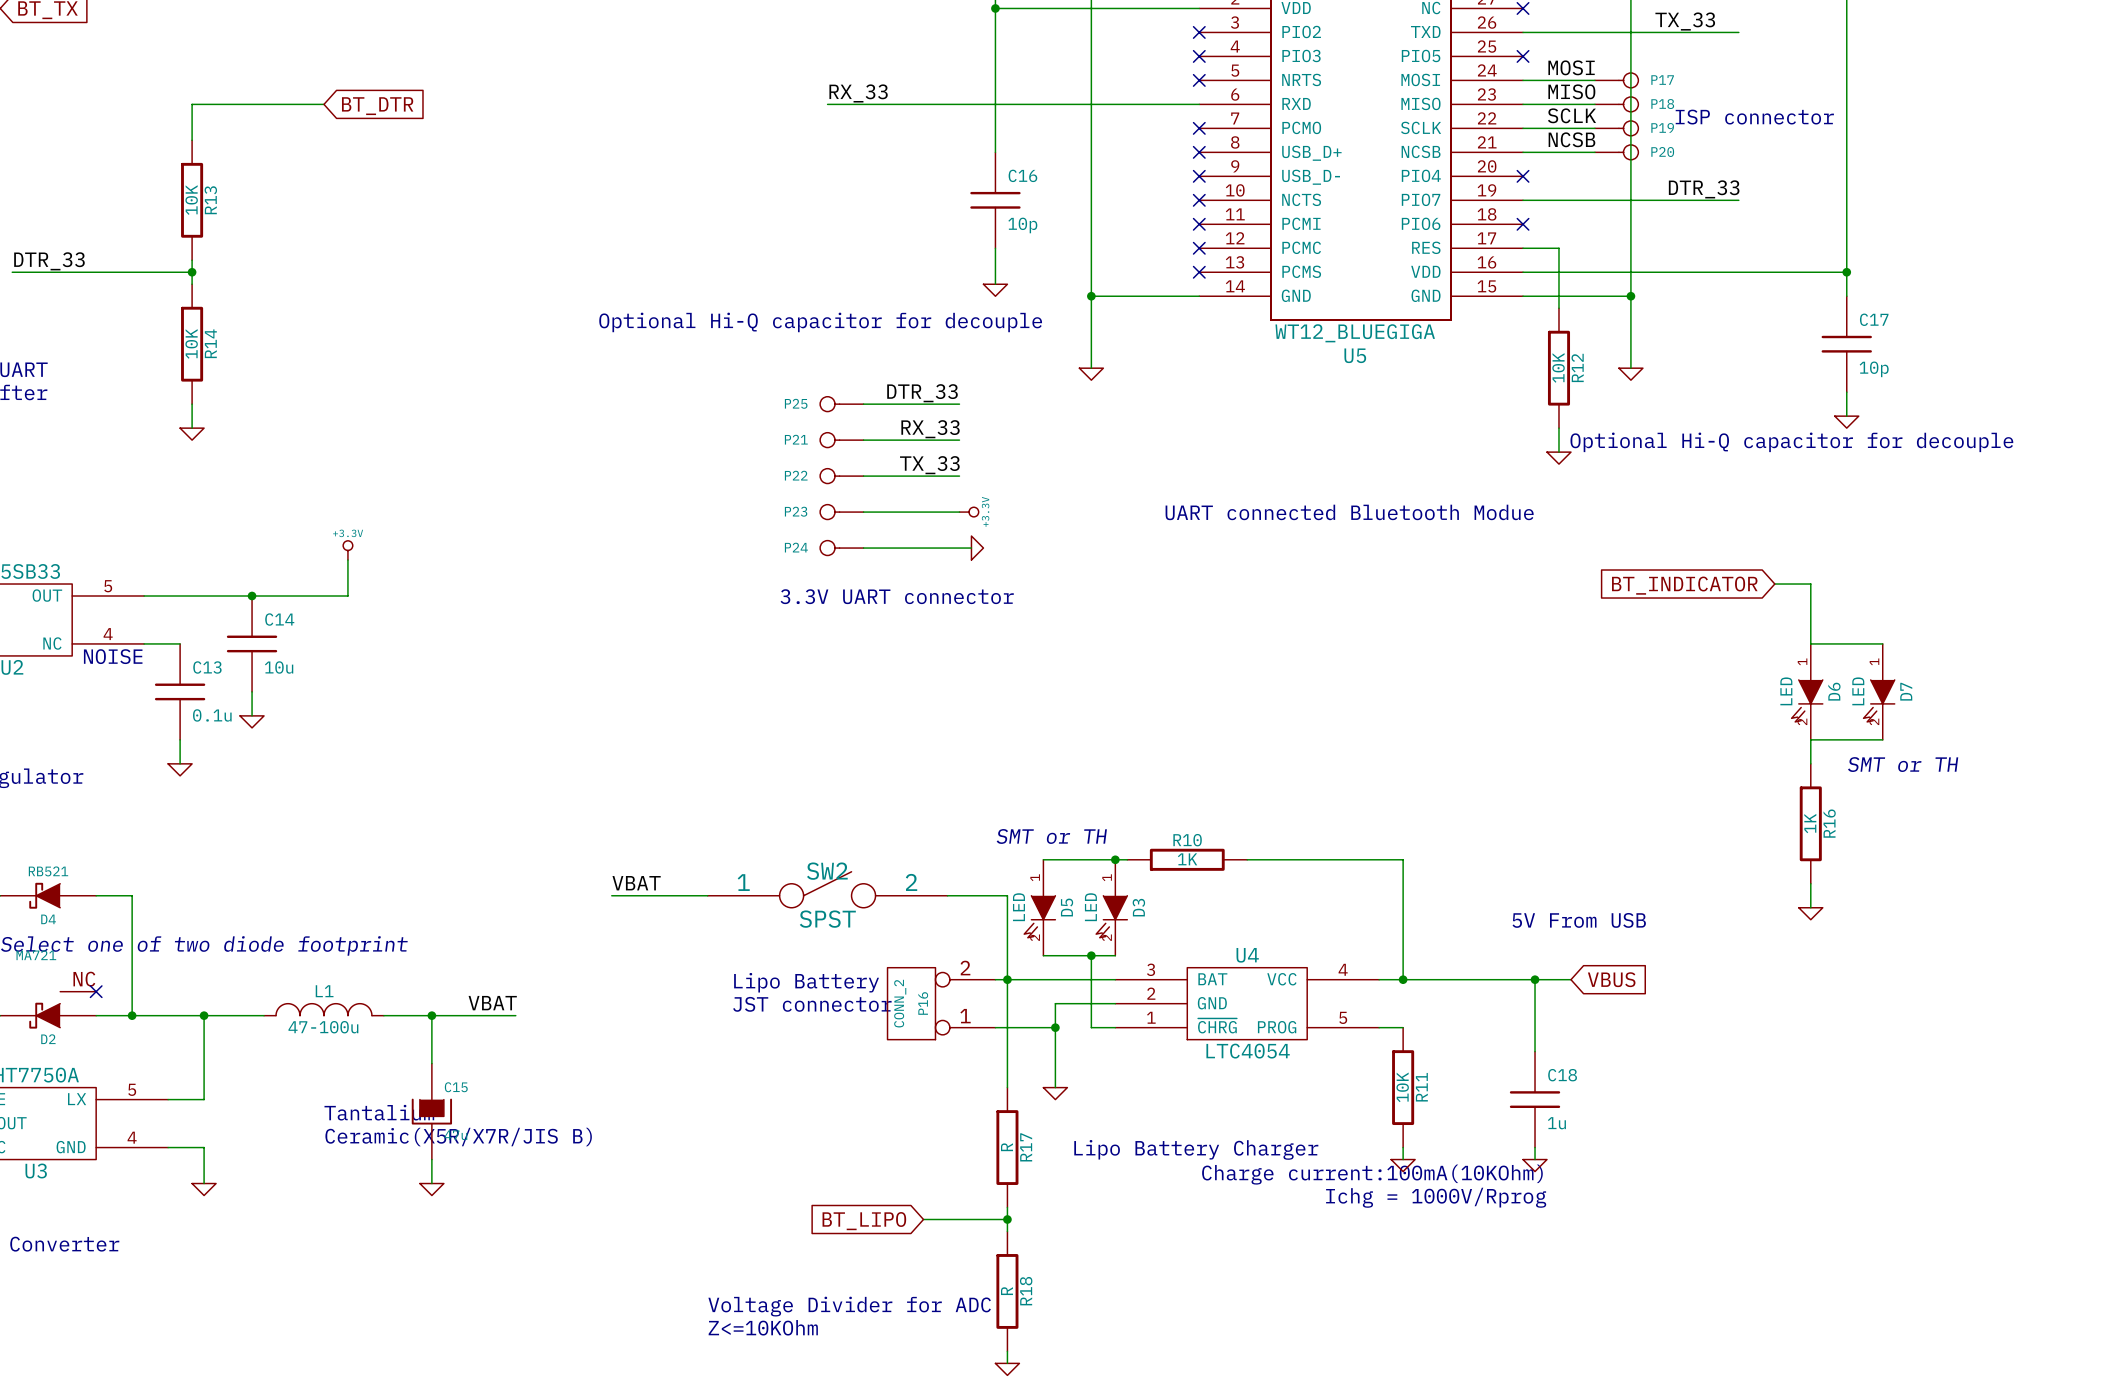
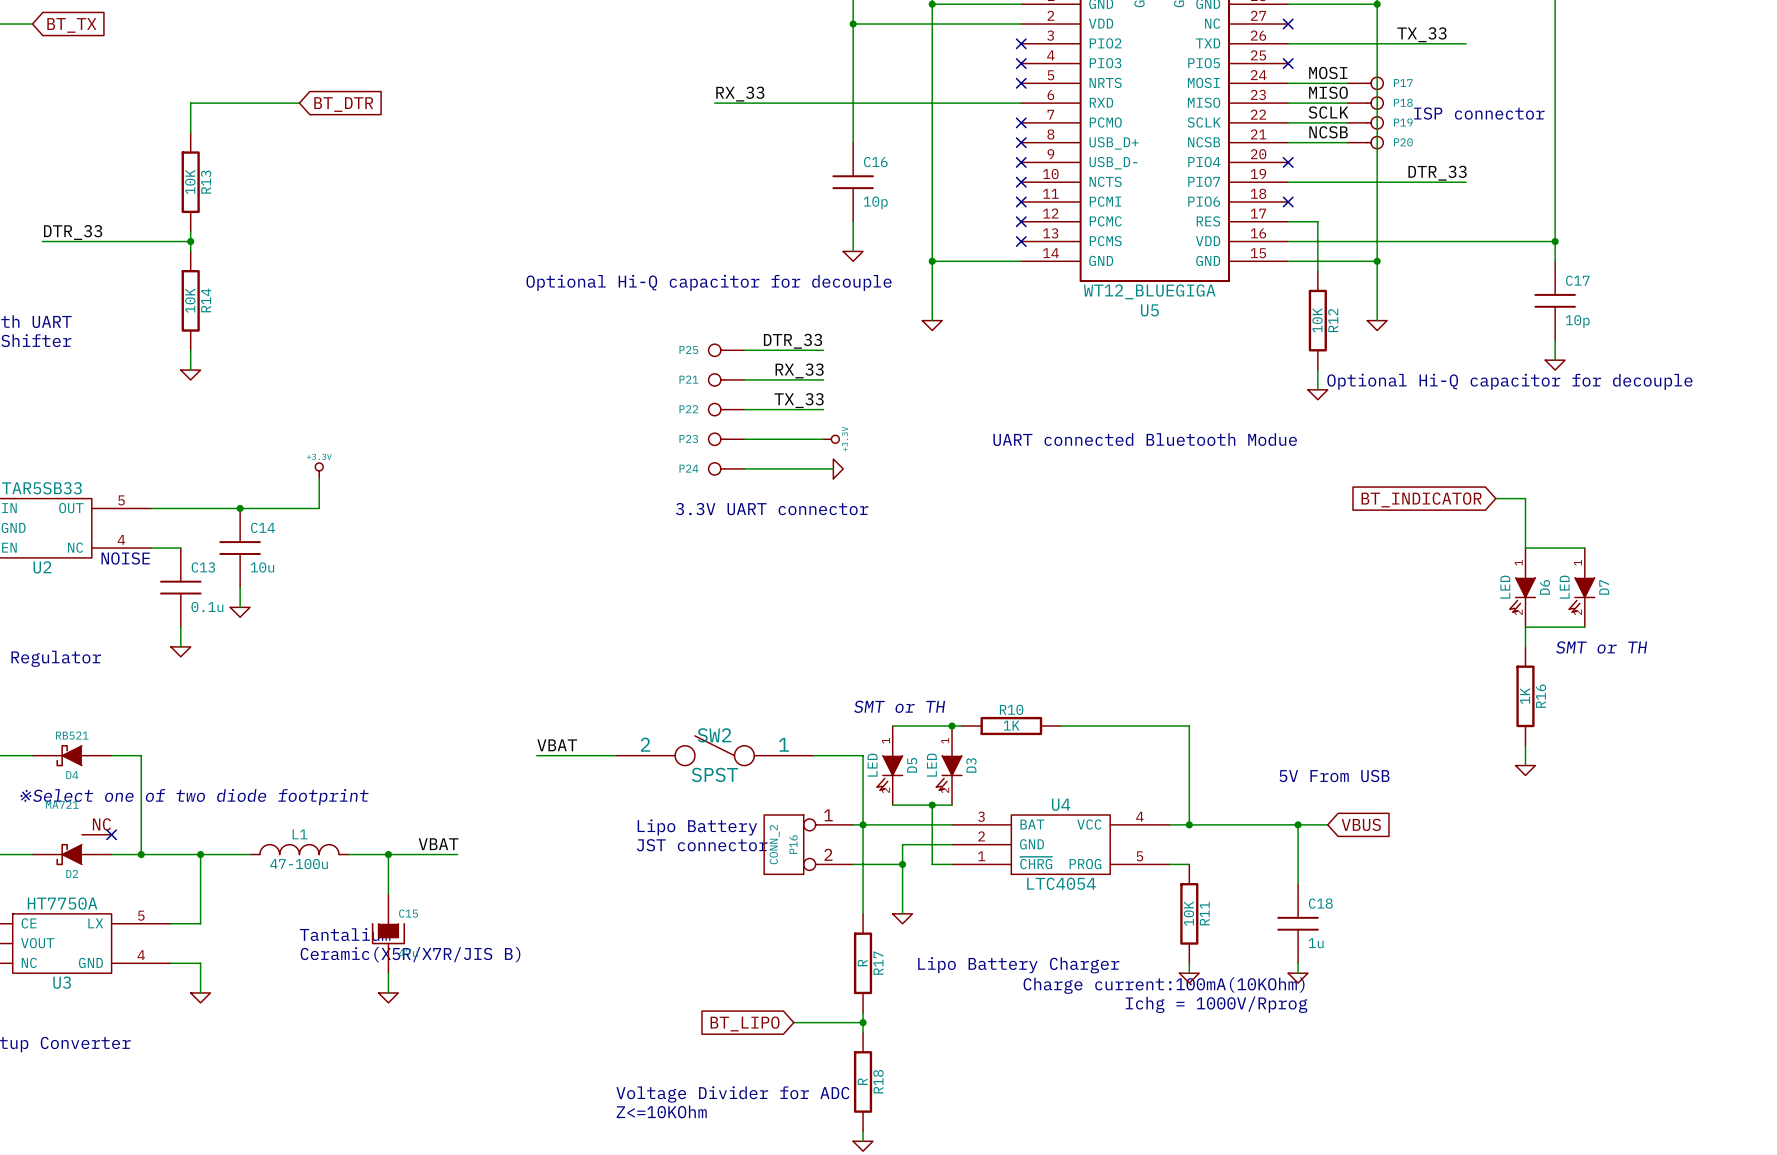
SW2 flip: as is (827, 889) -> left-right (714, 750)
P16 flip: as is (911, 1003) -> up-down (783, 844)

